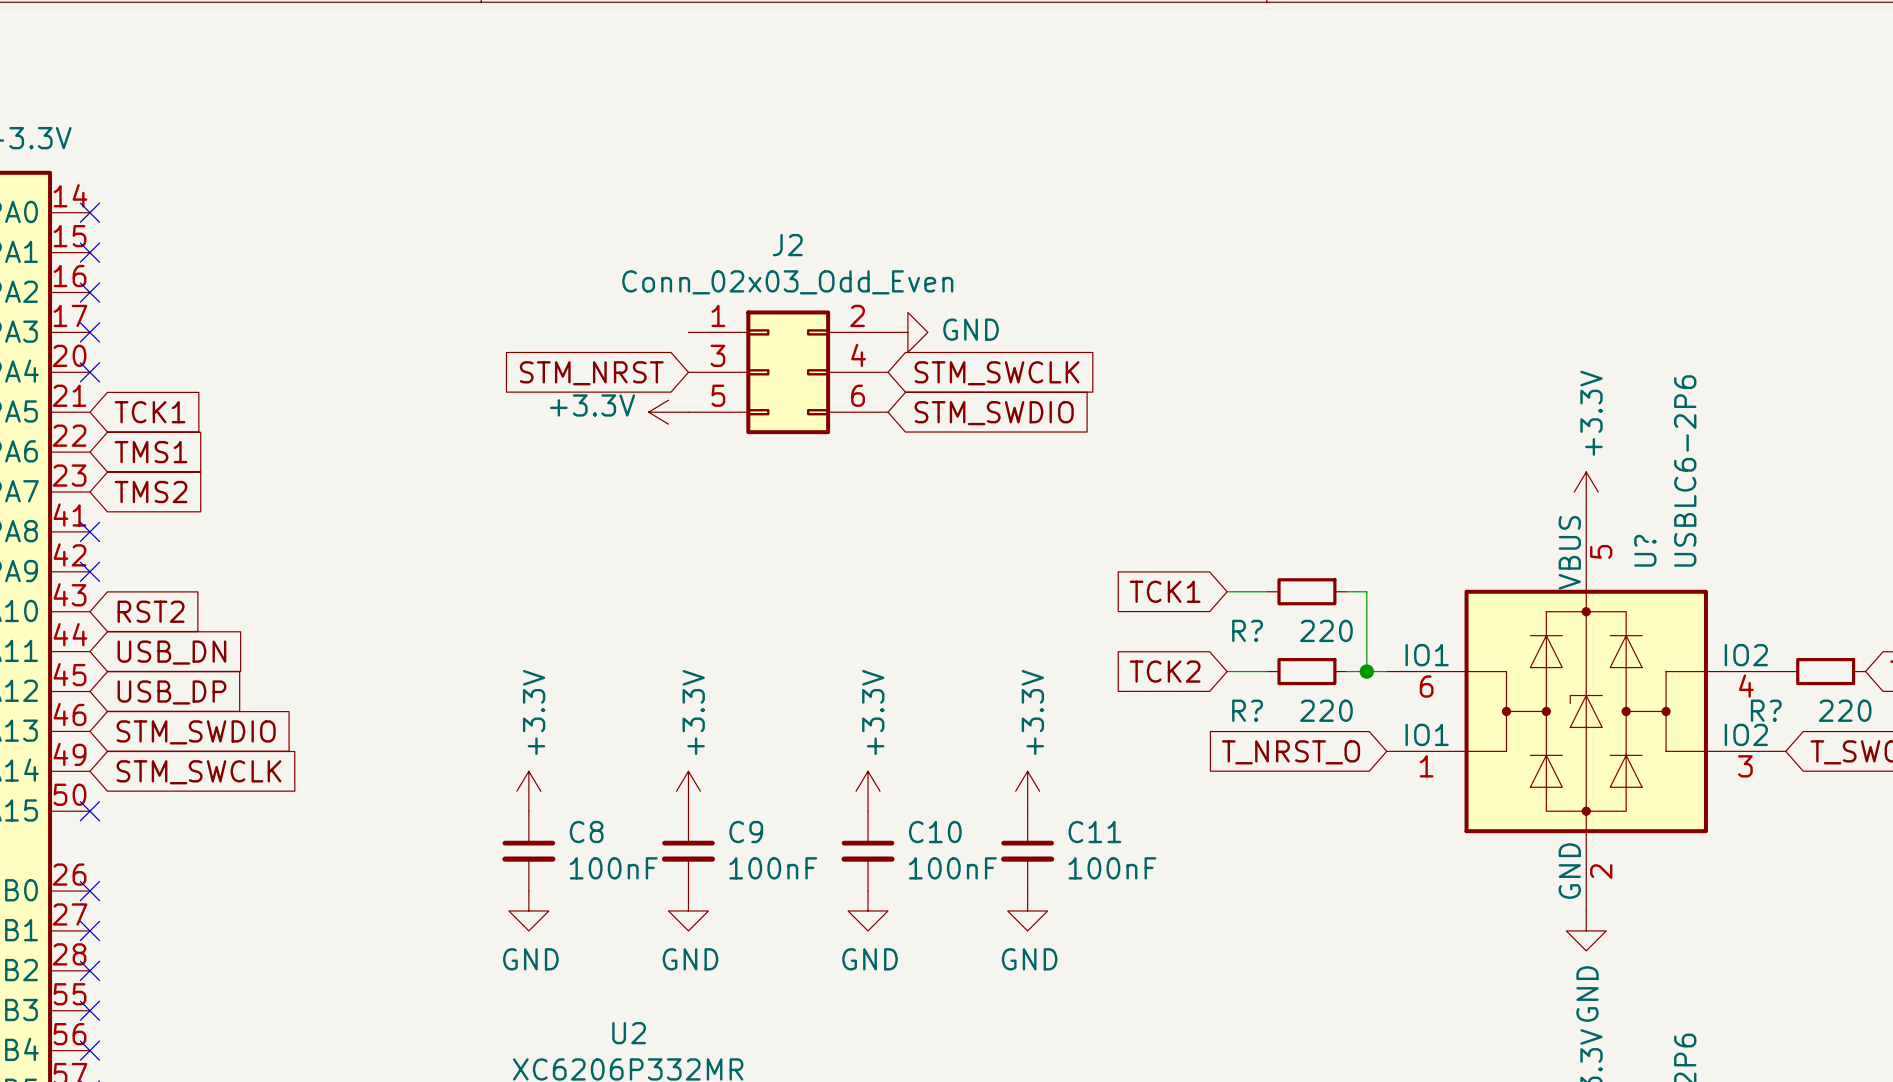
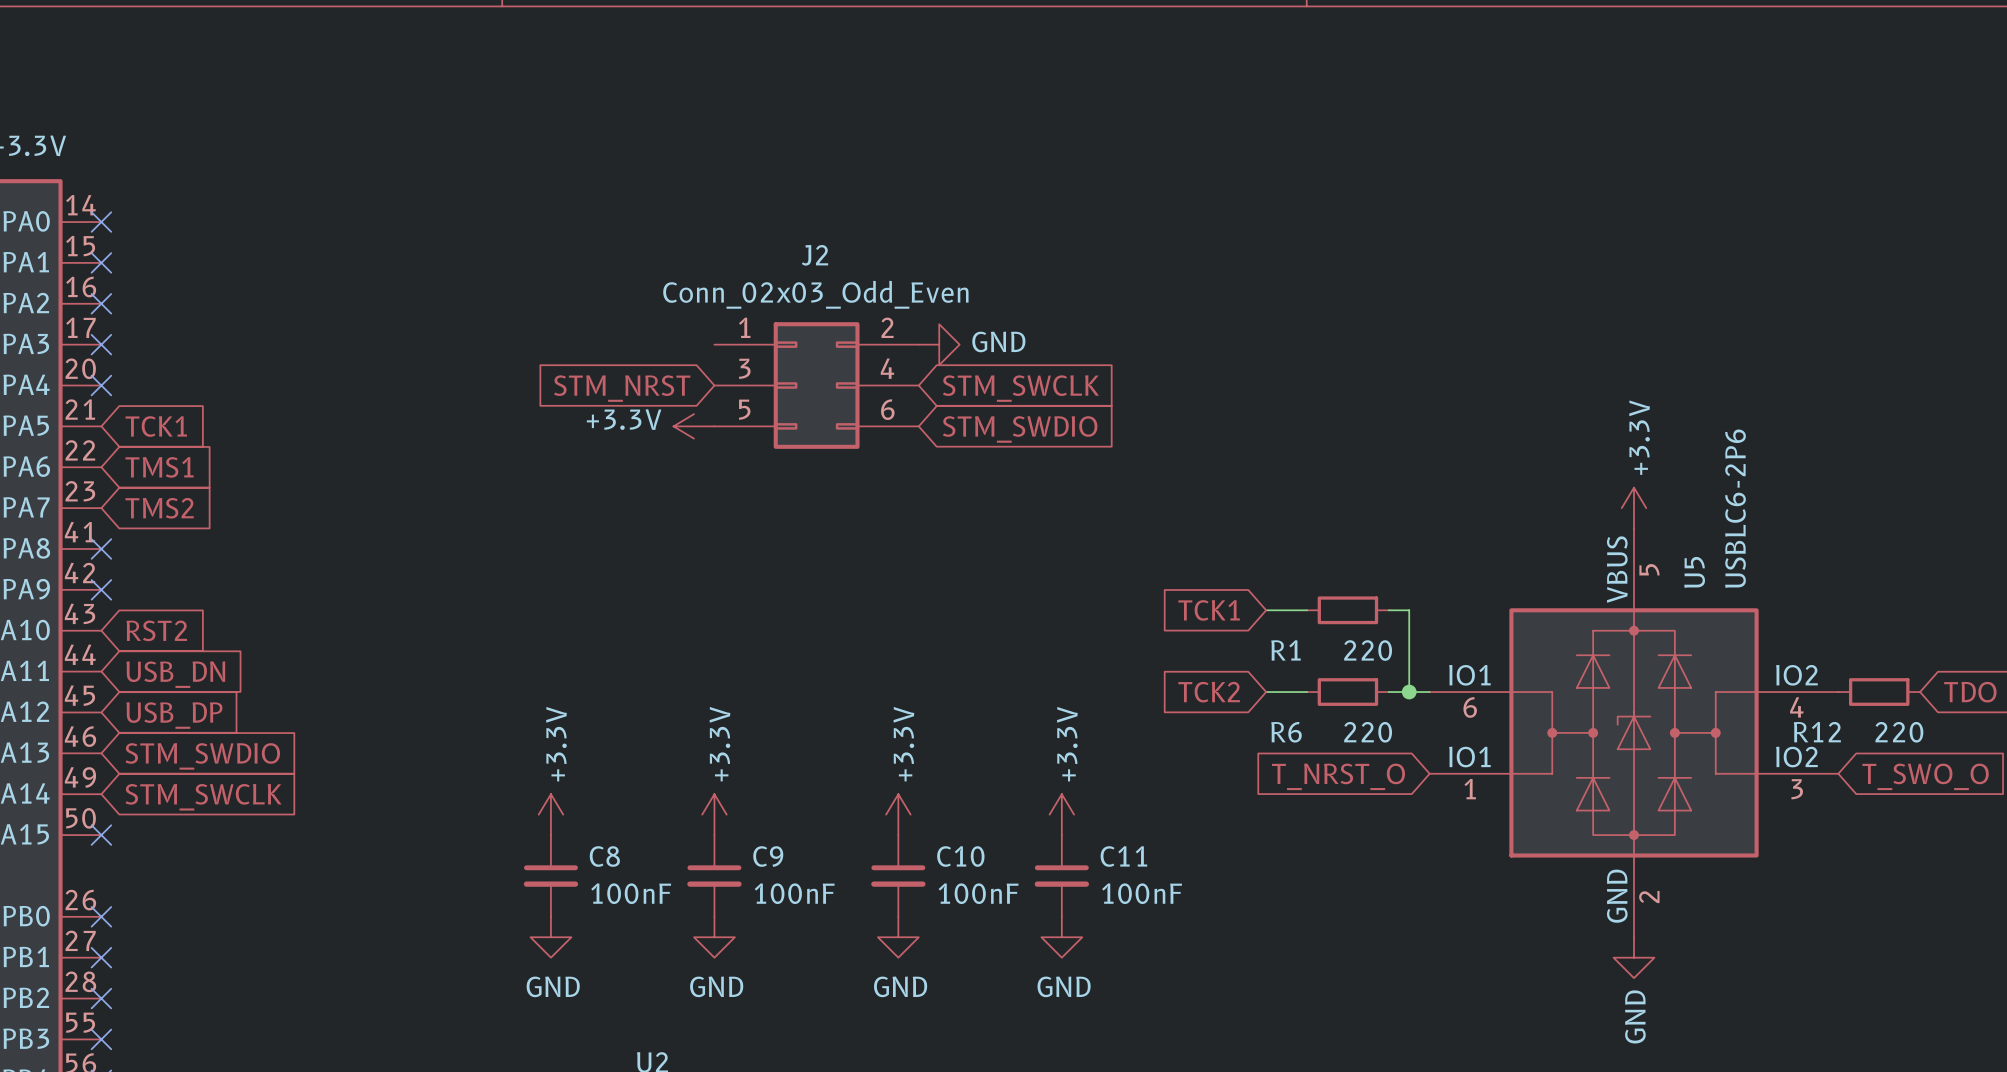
U? name: U? (1645, 550) -> U5 (1694, 572)
R? name: R? (1247, 630) -> R1 (1285, 650)
R? name: R? (1247, 710) -> R6 (1286, 732)
R? name: R? (1766, 710) -> R12 (1817, 732)

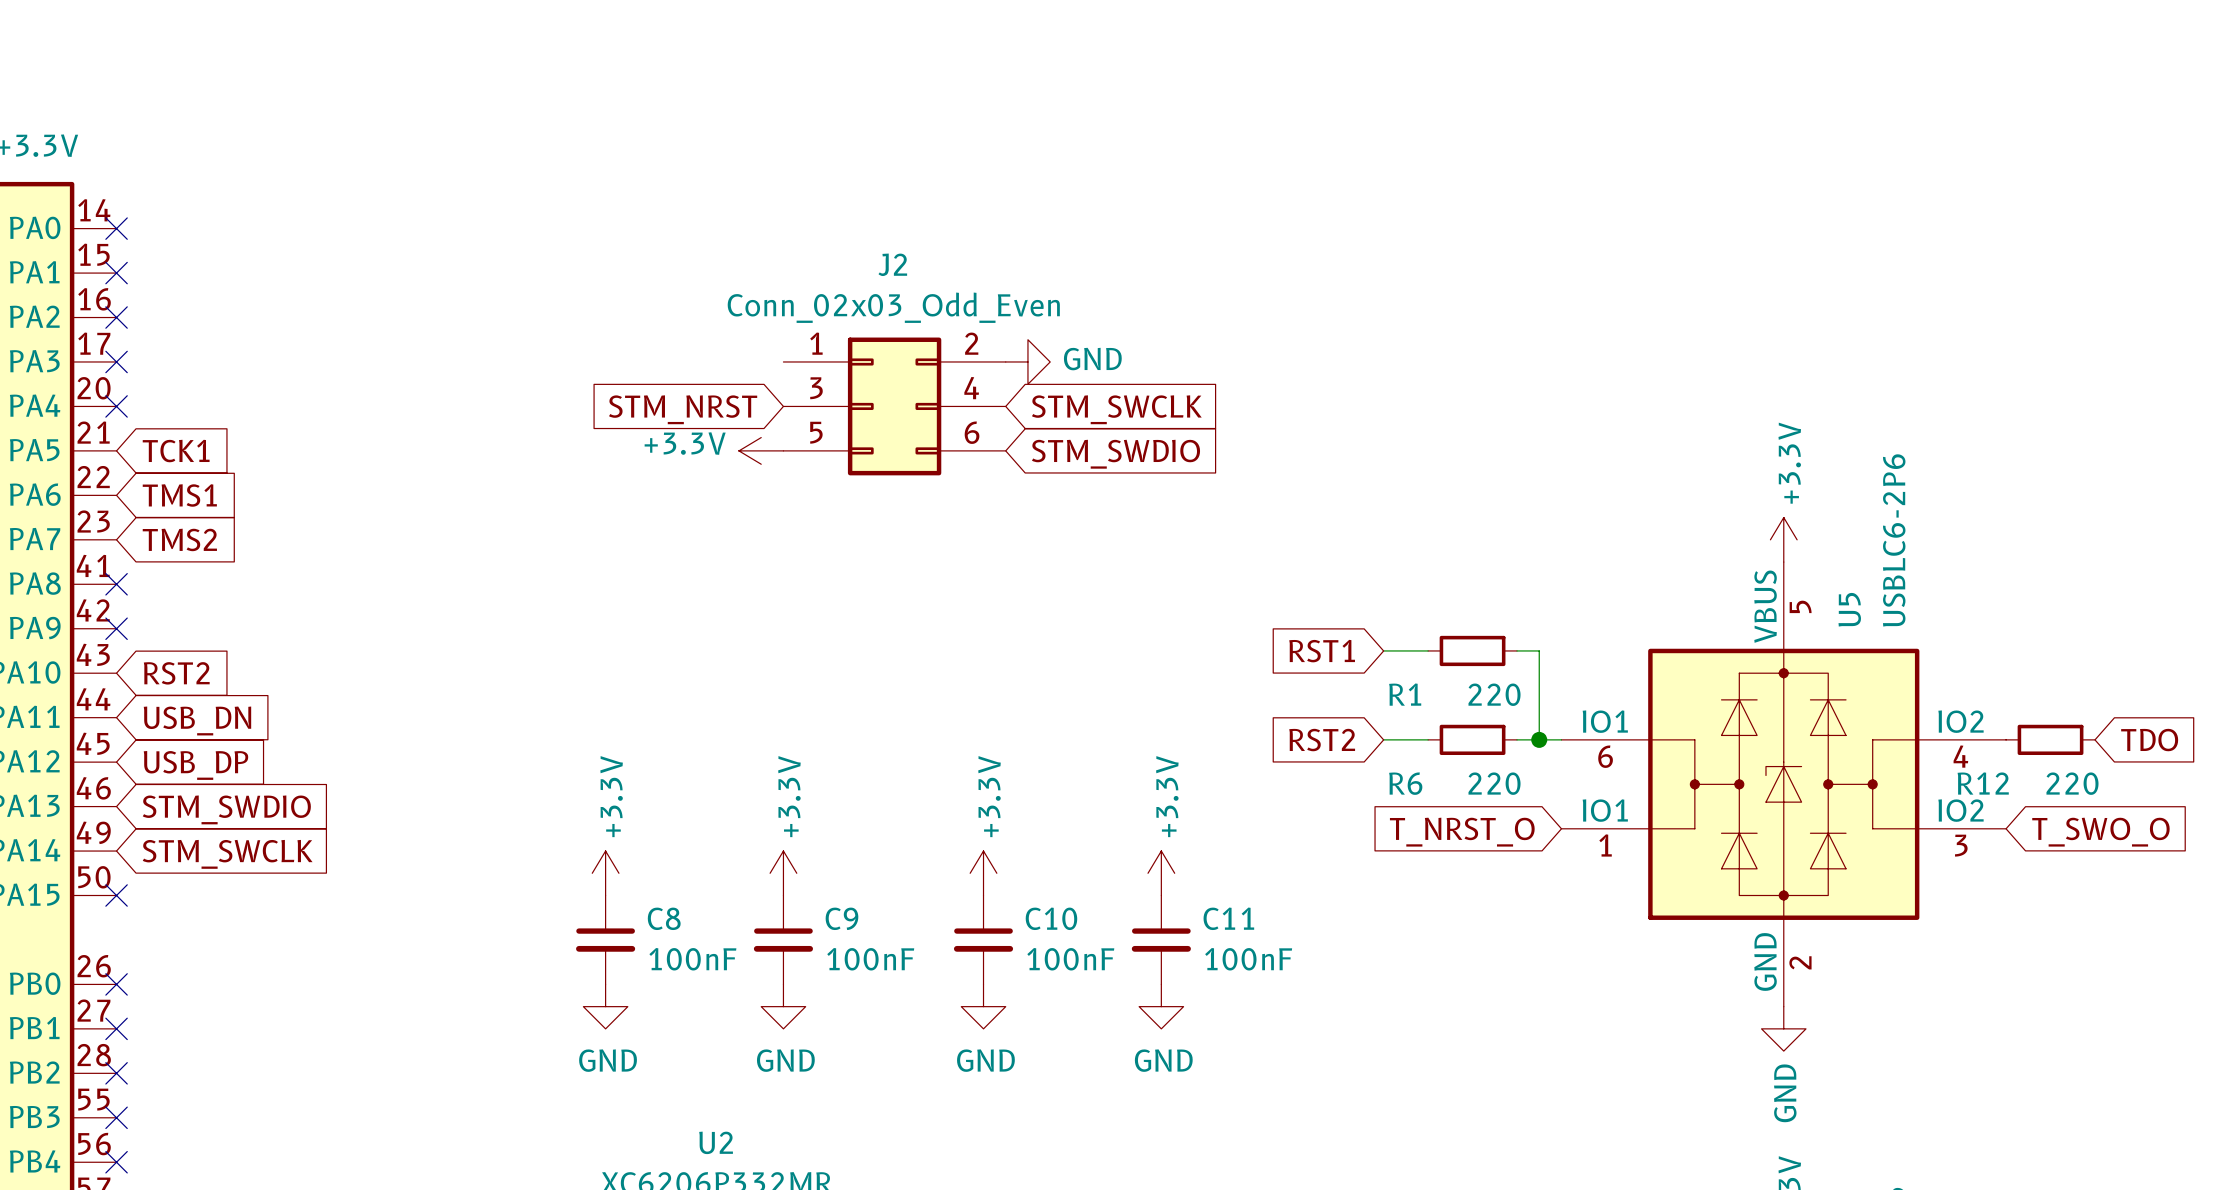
global label: TCK1 (1209, 610) -> RST1 (1322, 651)
global label: TCK2 (1209, 692) -> RST2 (1322, 740)

